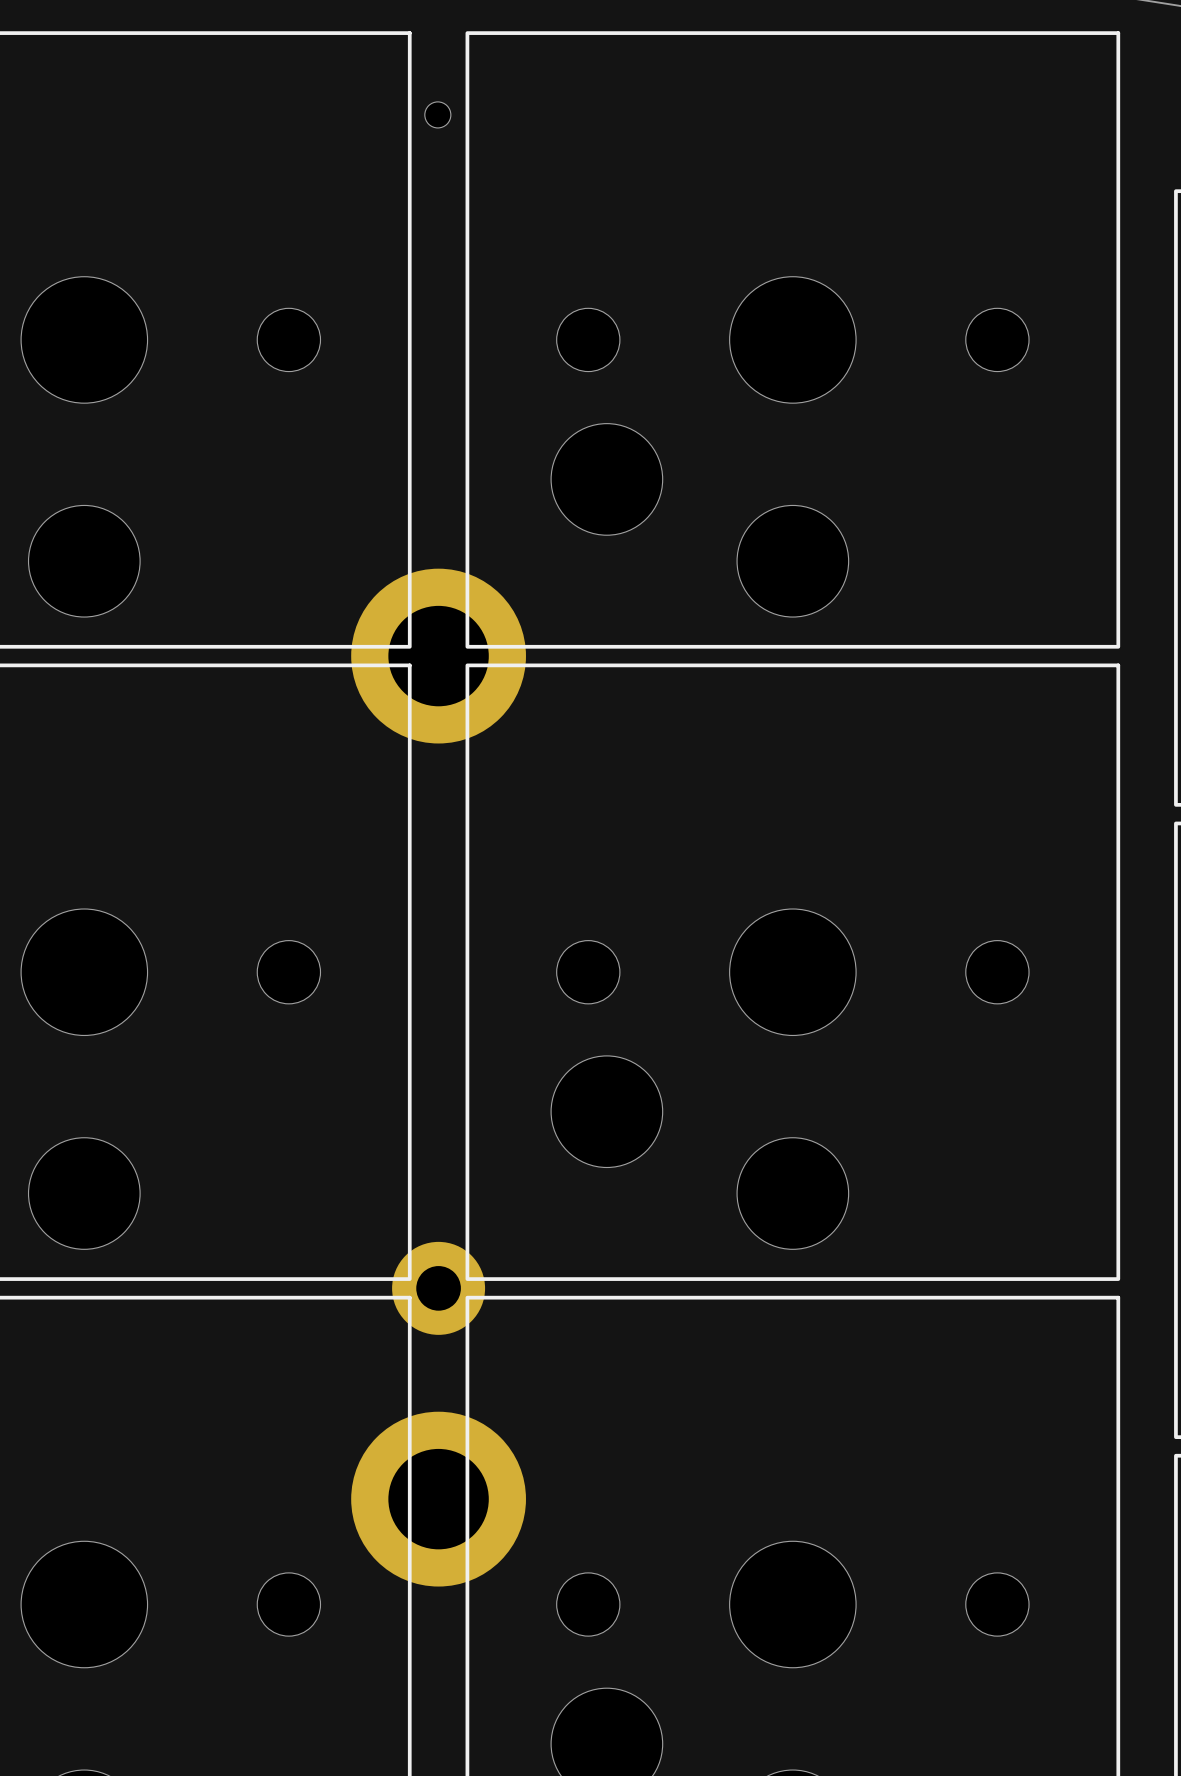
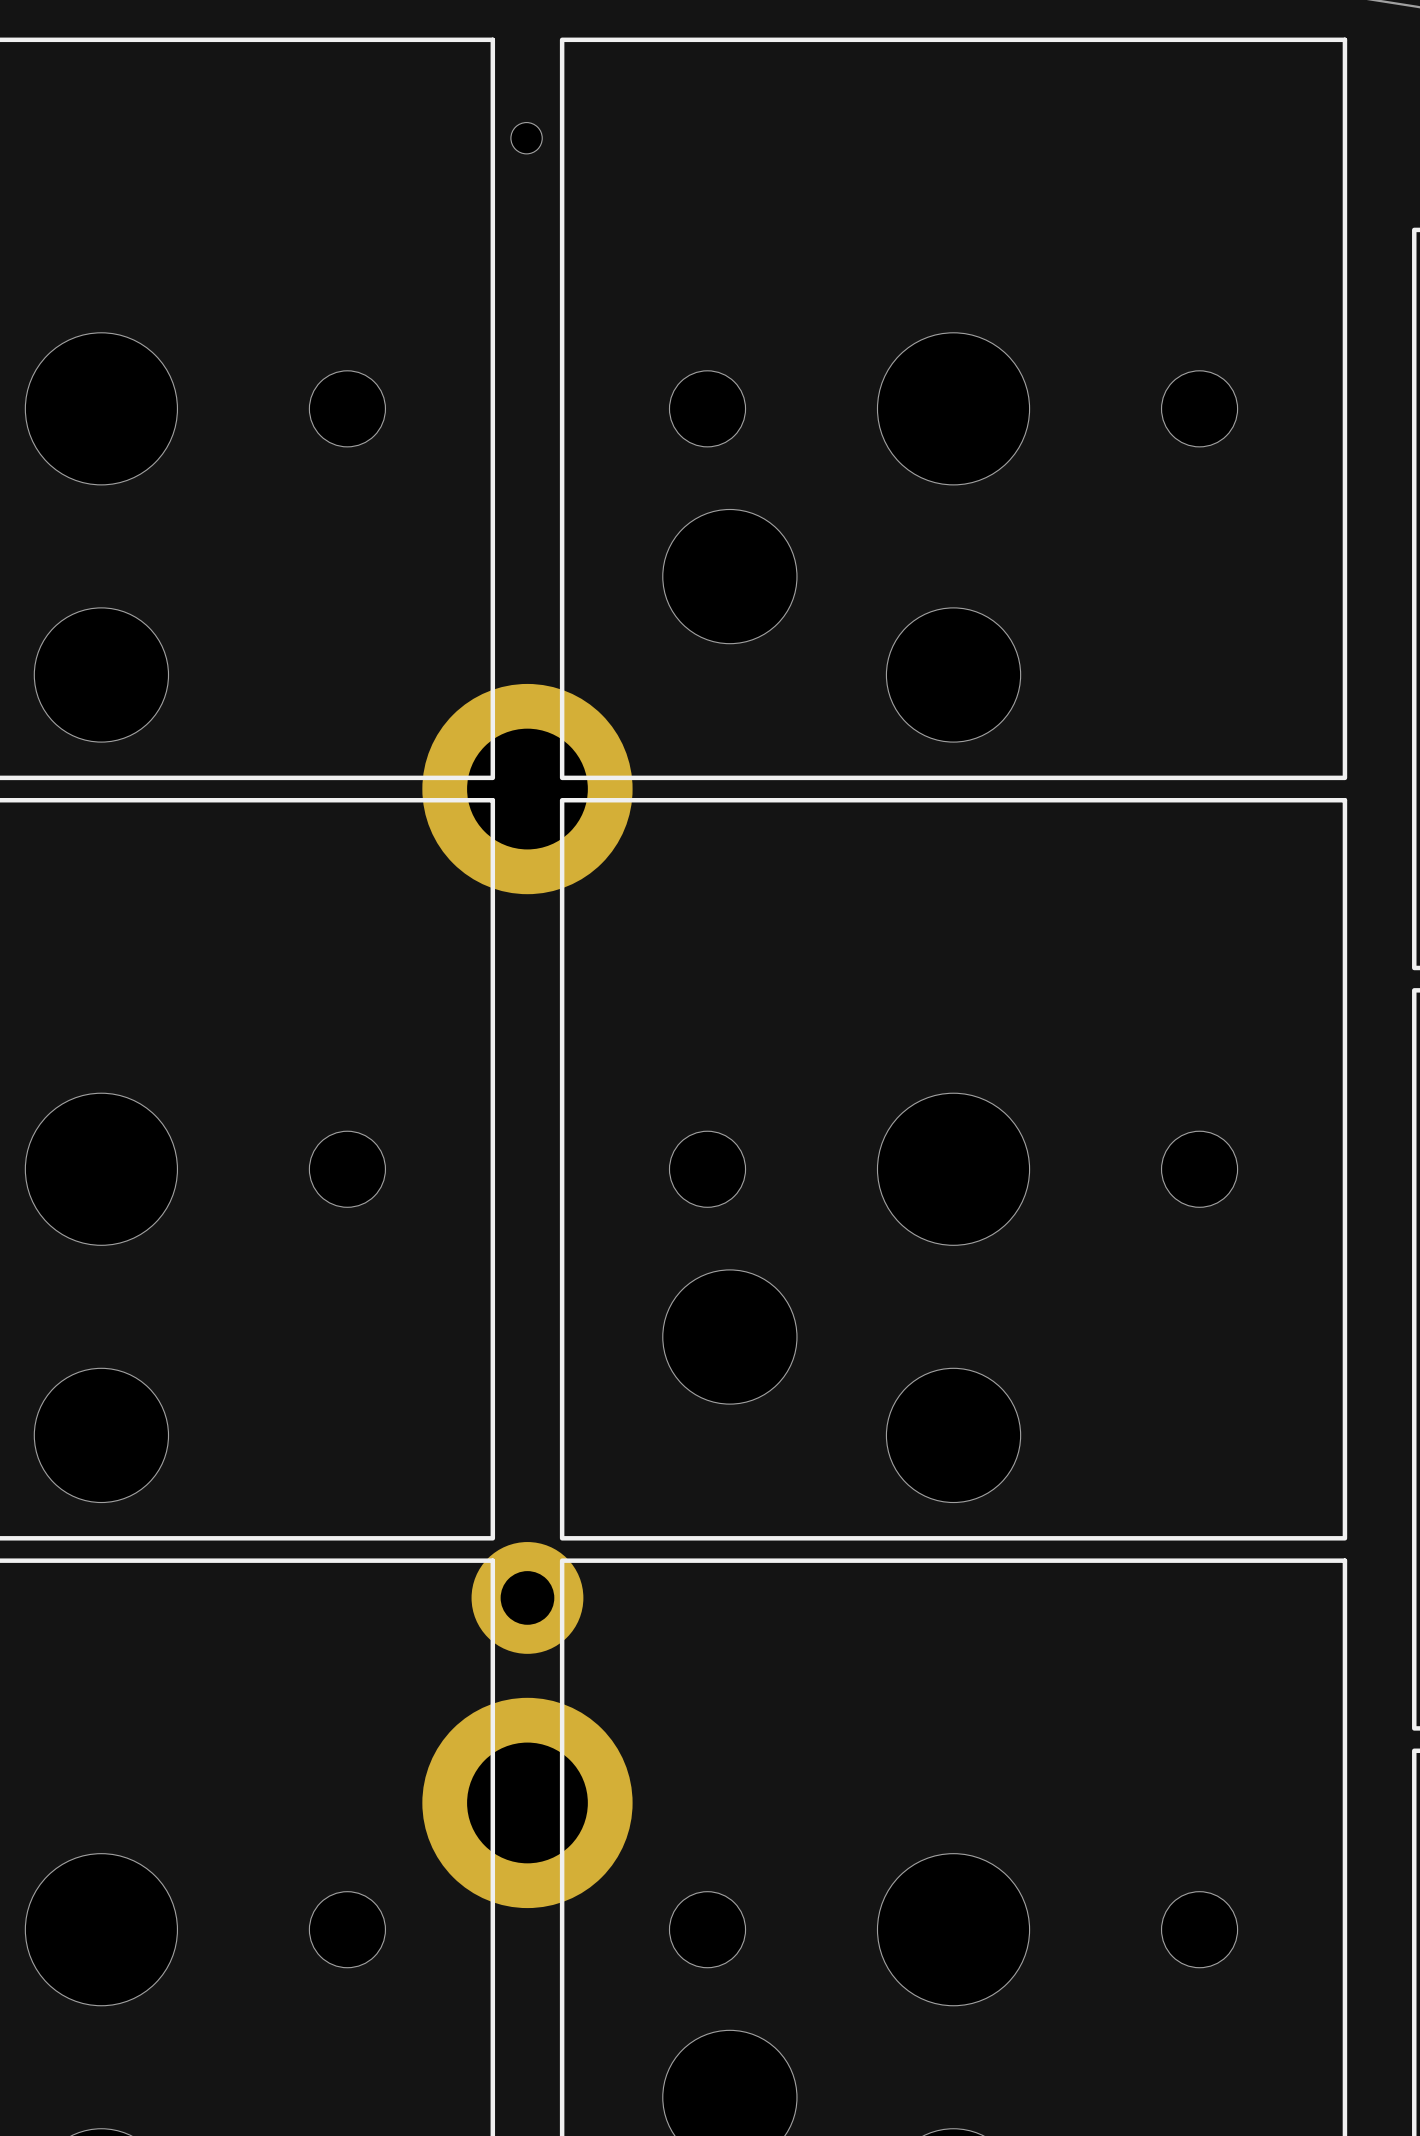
part position: (438, 1288) -> (527, 1597)

